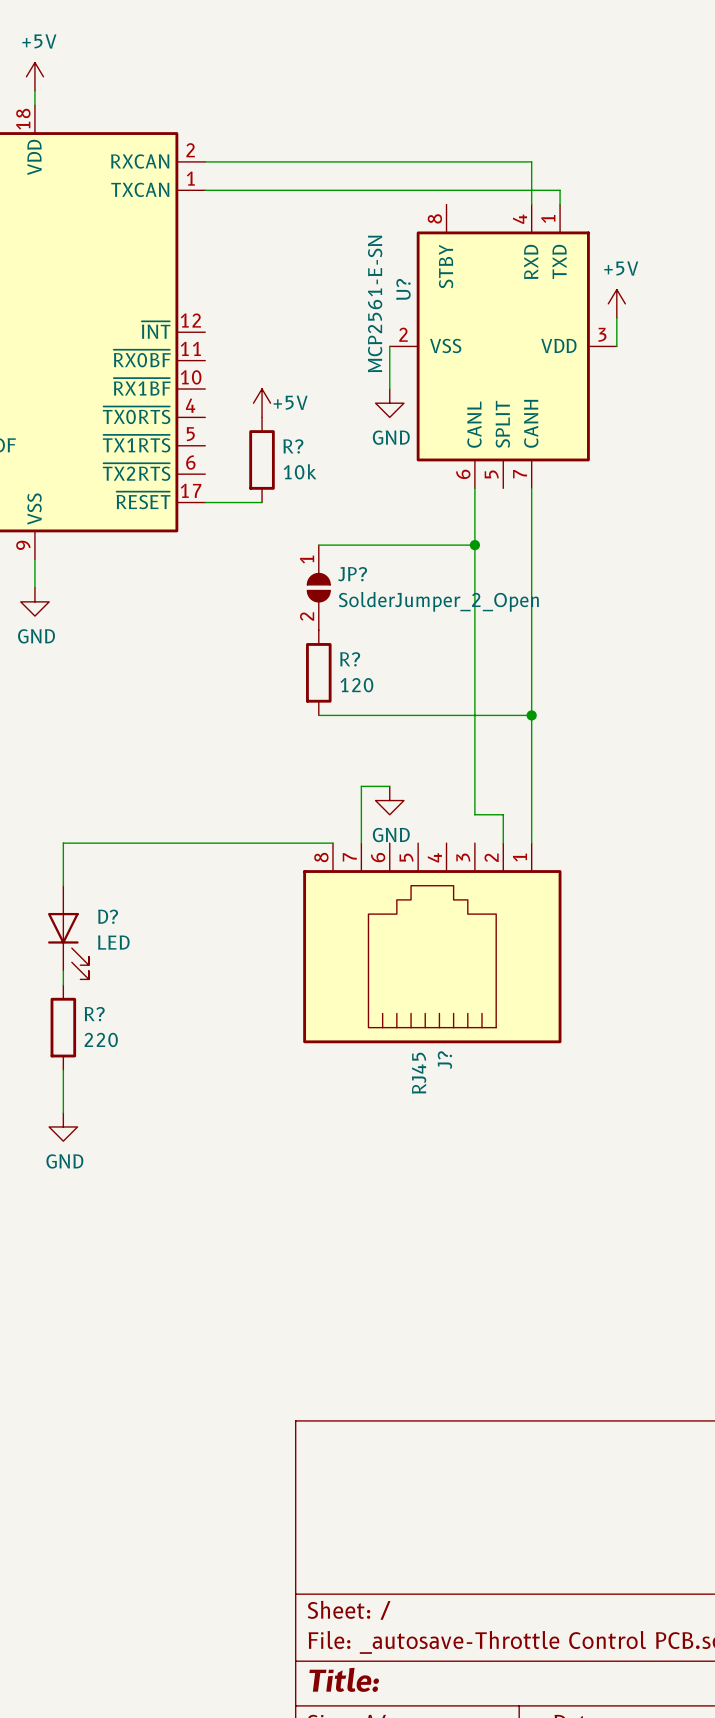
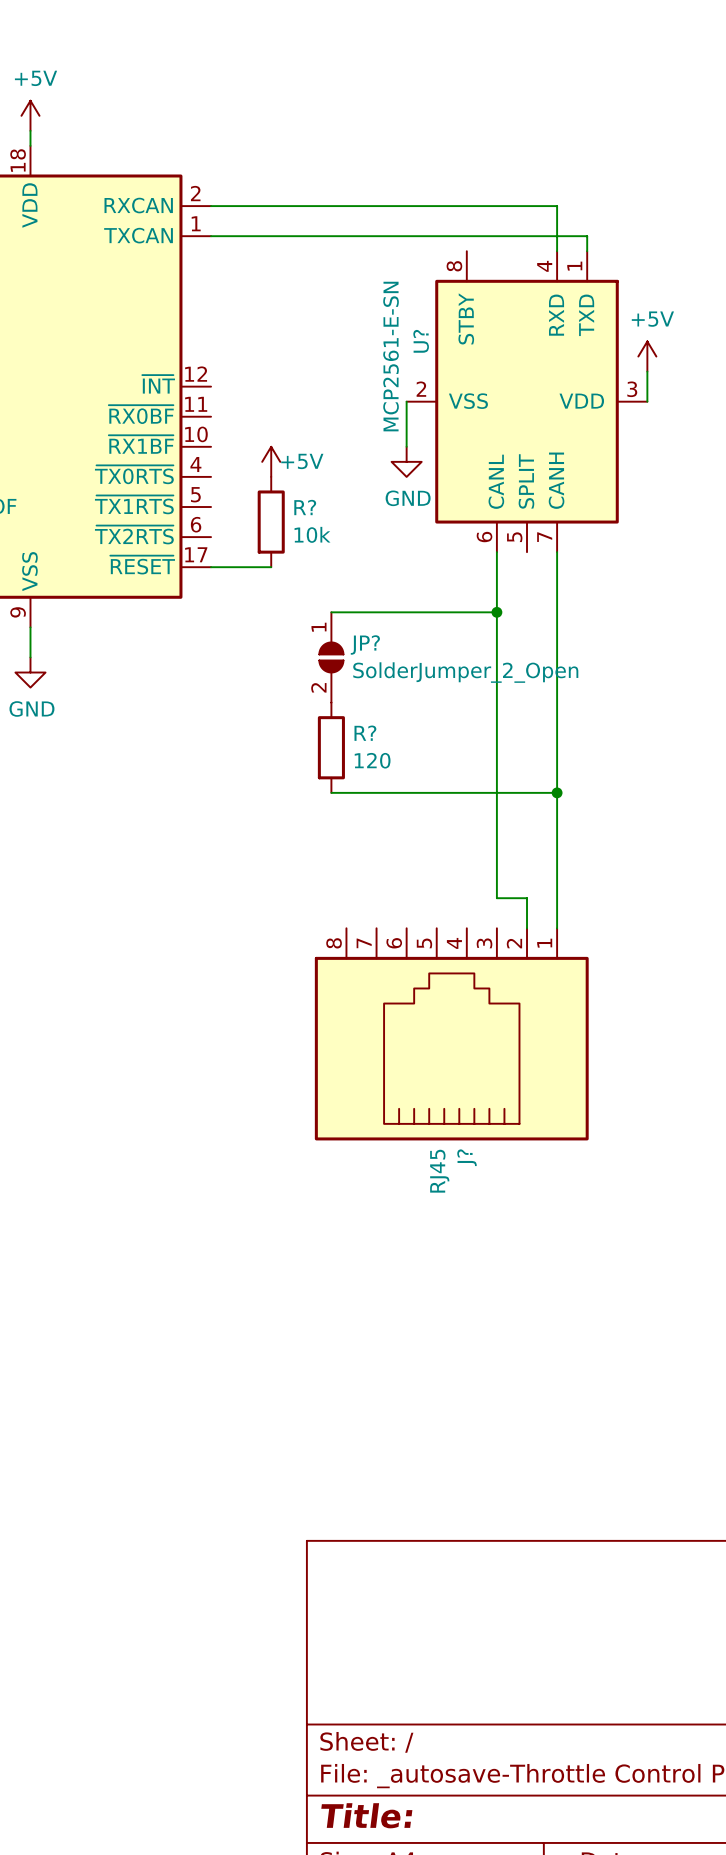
wire: (389, 786) (361, 786) (361, 843) -> none
power symbol: GND (389, 800) -> none
wire: (332, 843) (63, 843) (63, 885) -> none
D?: LED (68, 932) -> none
wire: (63, 970) (63, 985) -> none
R?: 220 (63, 1027) -> none
wire: (63, 1070) (63, 1112) -> none
power symbol: GND (63, 1126) -> none

